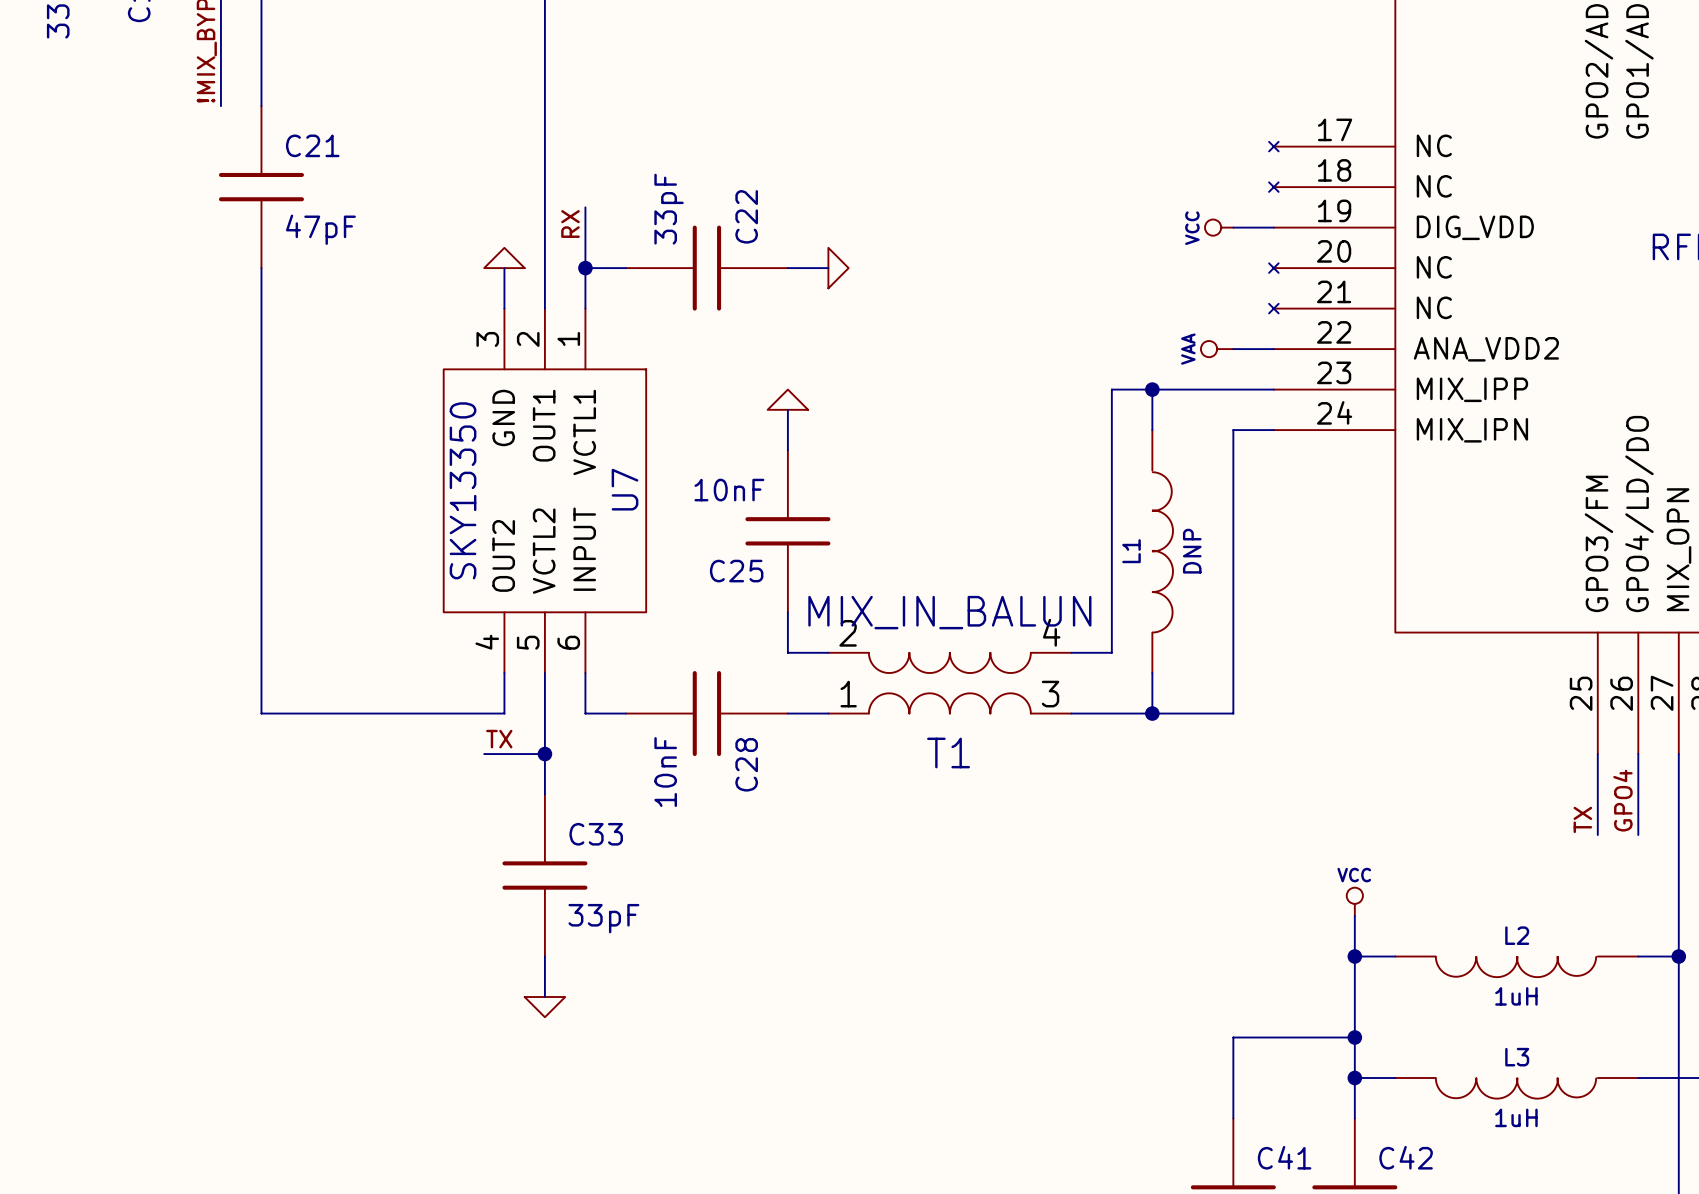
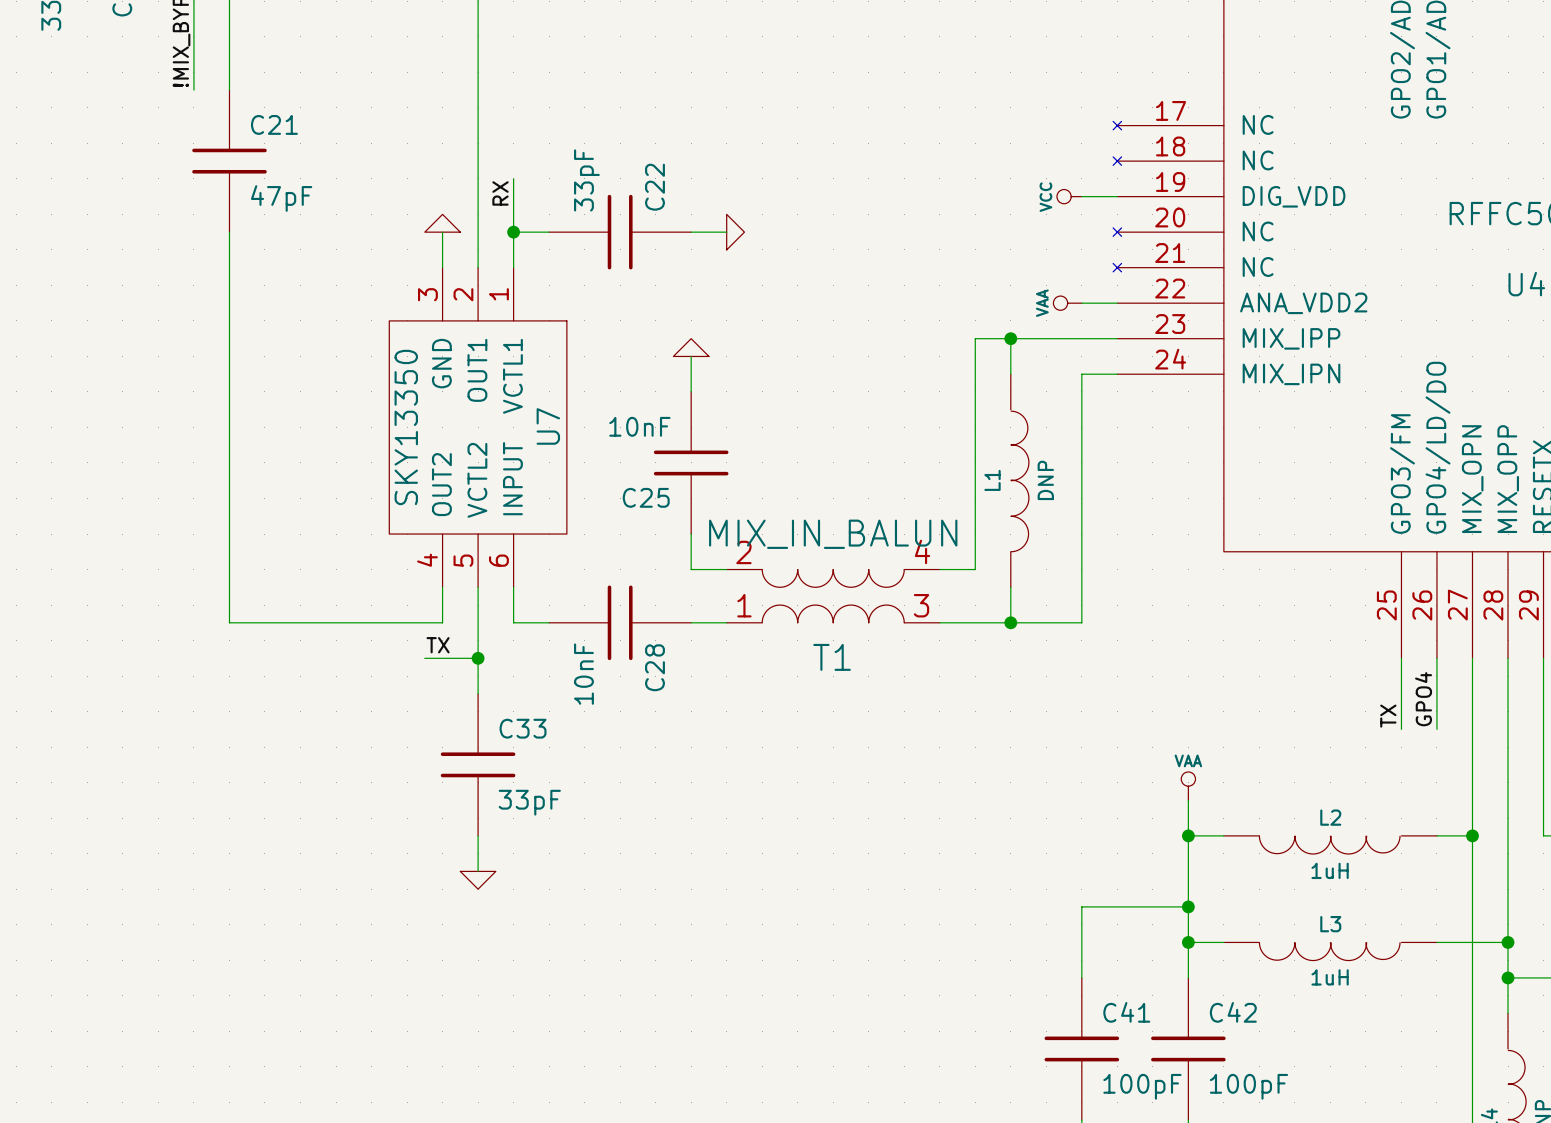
power symbol: VCC (1354, 901) -> VAA (1188, 786)

